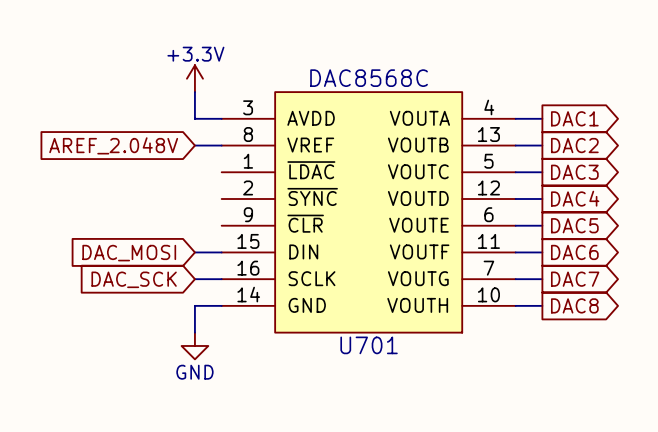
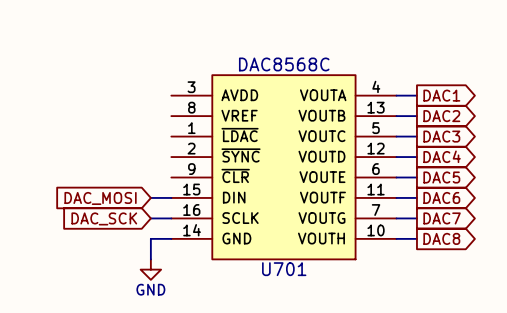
power symbol: +3.3V (194, 78) -> none
wire: (194, 92) (194, 118) (221, 118) -> none
global label: AREF_2.048V (113, 145) -> none
wire: (194, 145) (221, 145) -> none

